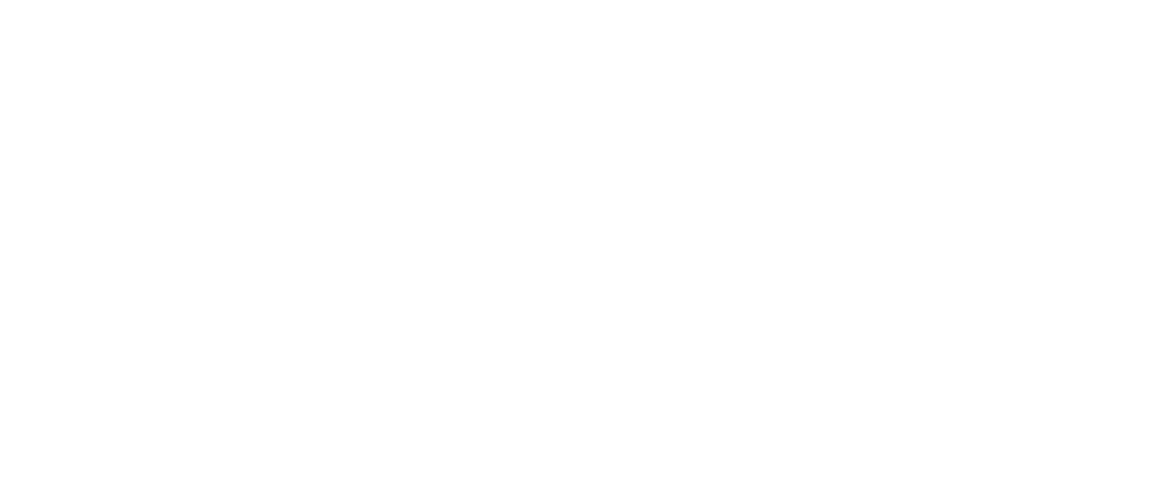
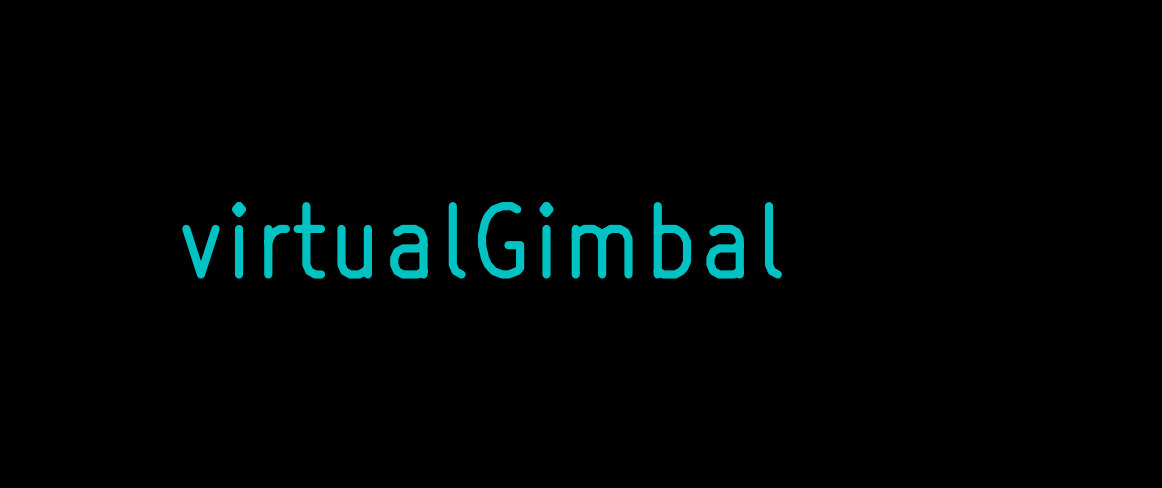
text: none -> virtualGimbal (482, 240)

